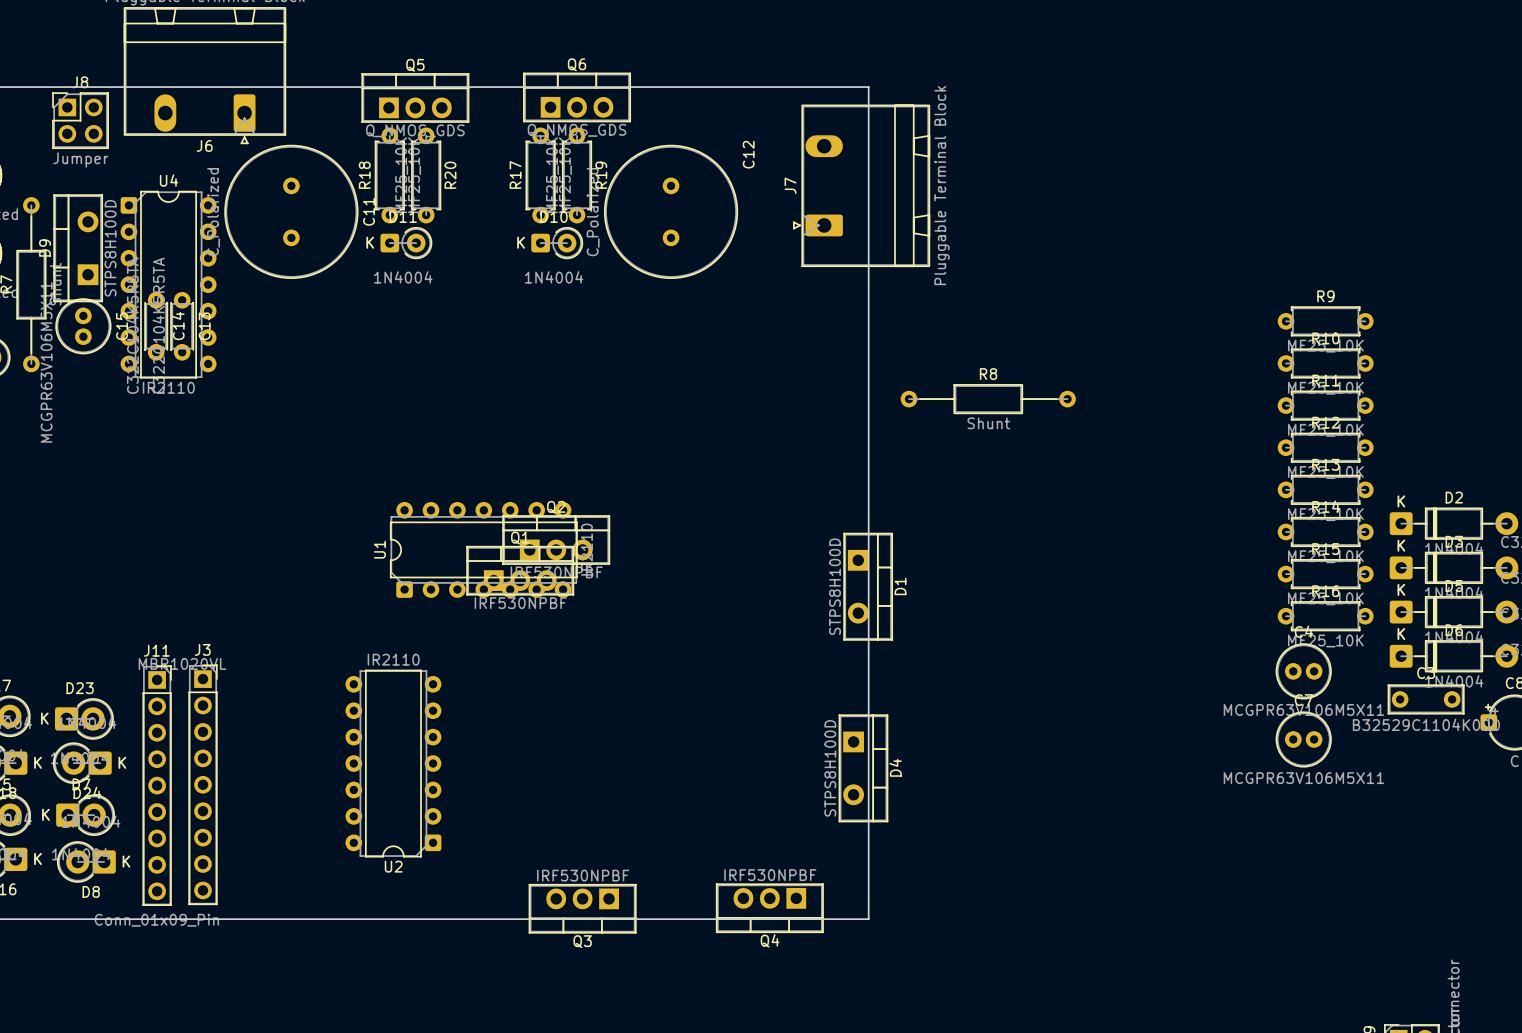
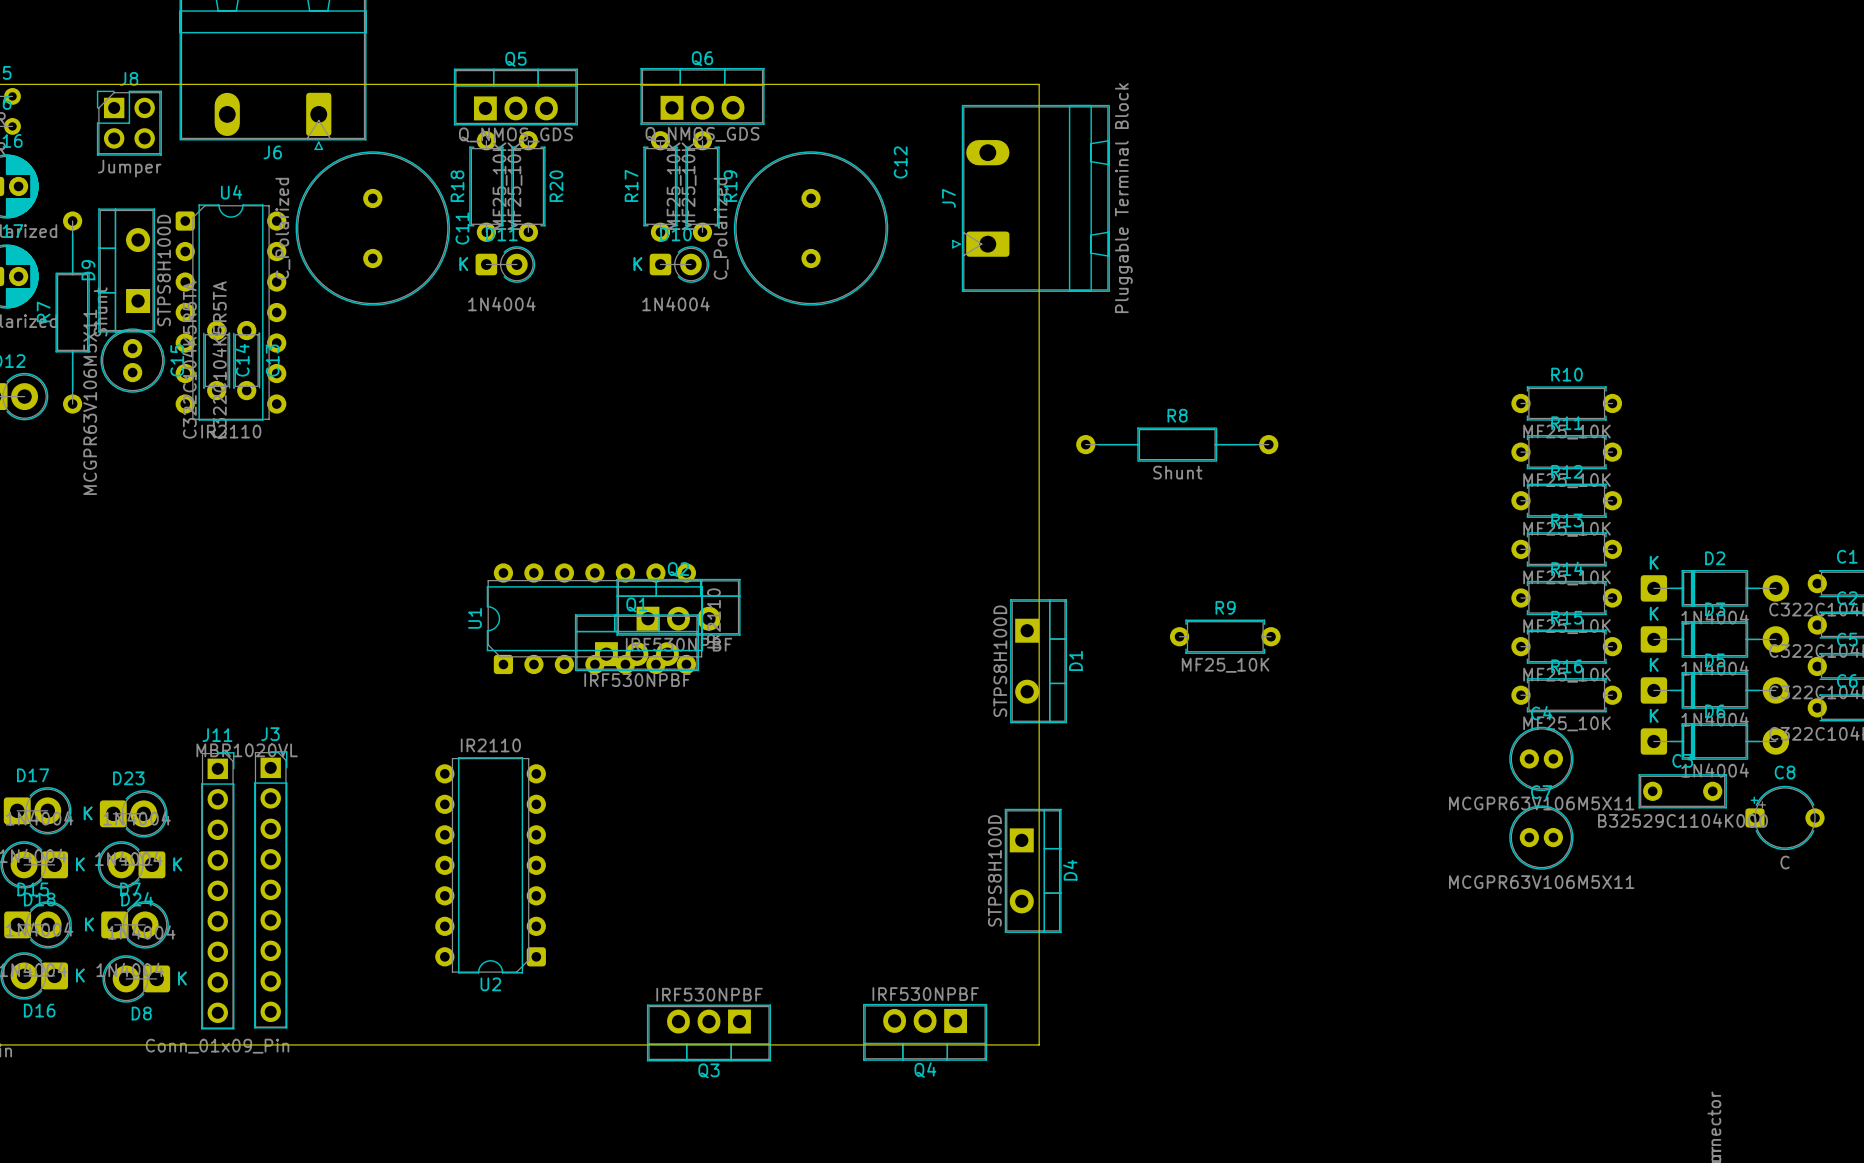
R9 position: (1325, 321) -> (1225, 636)

